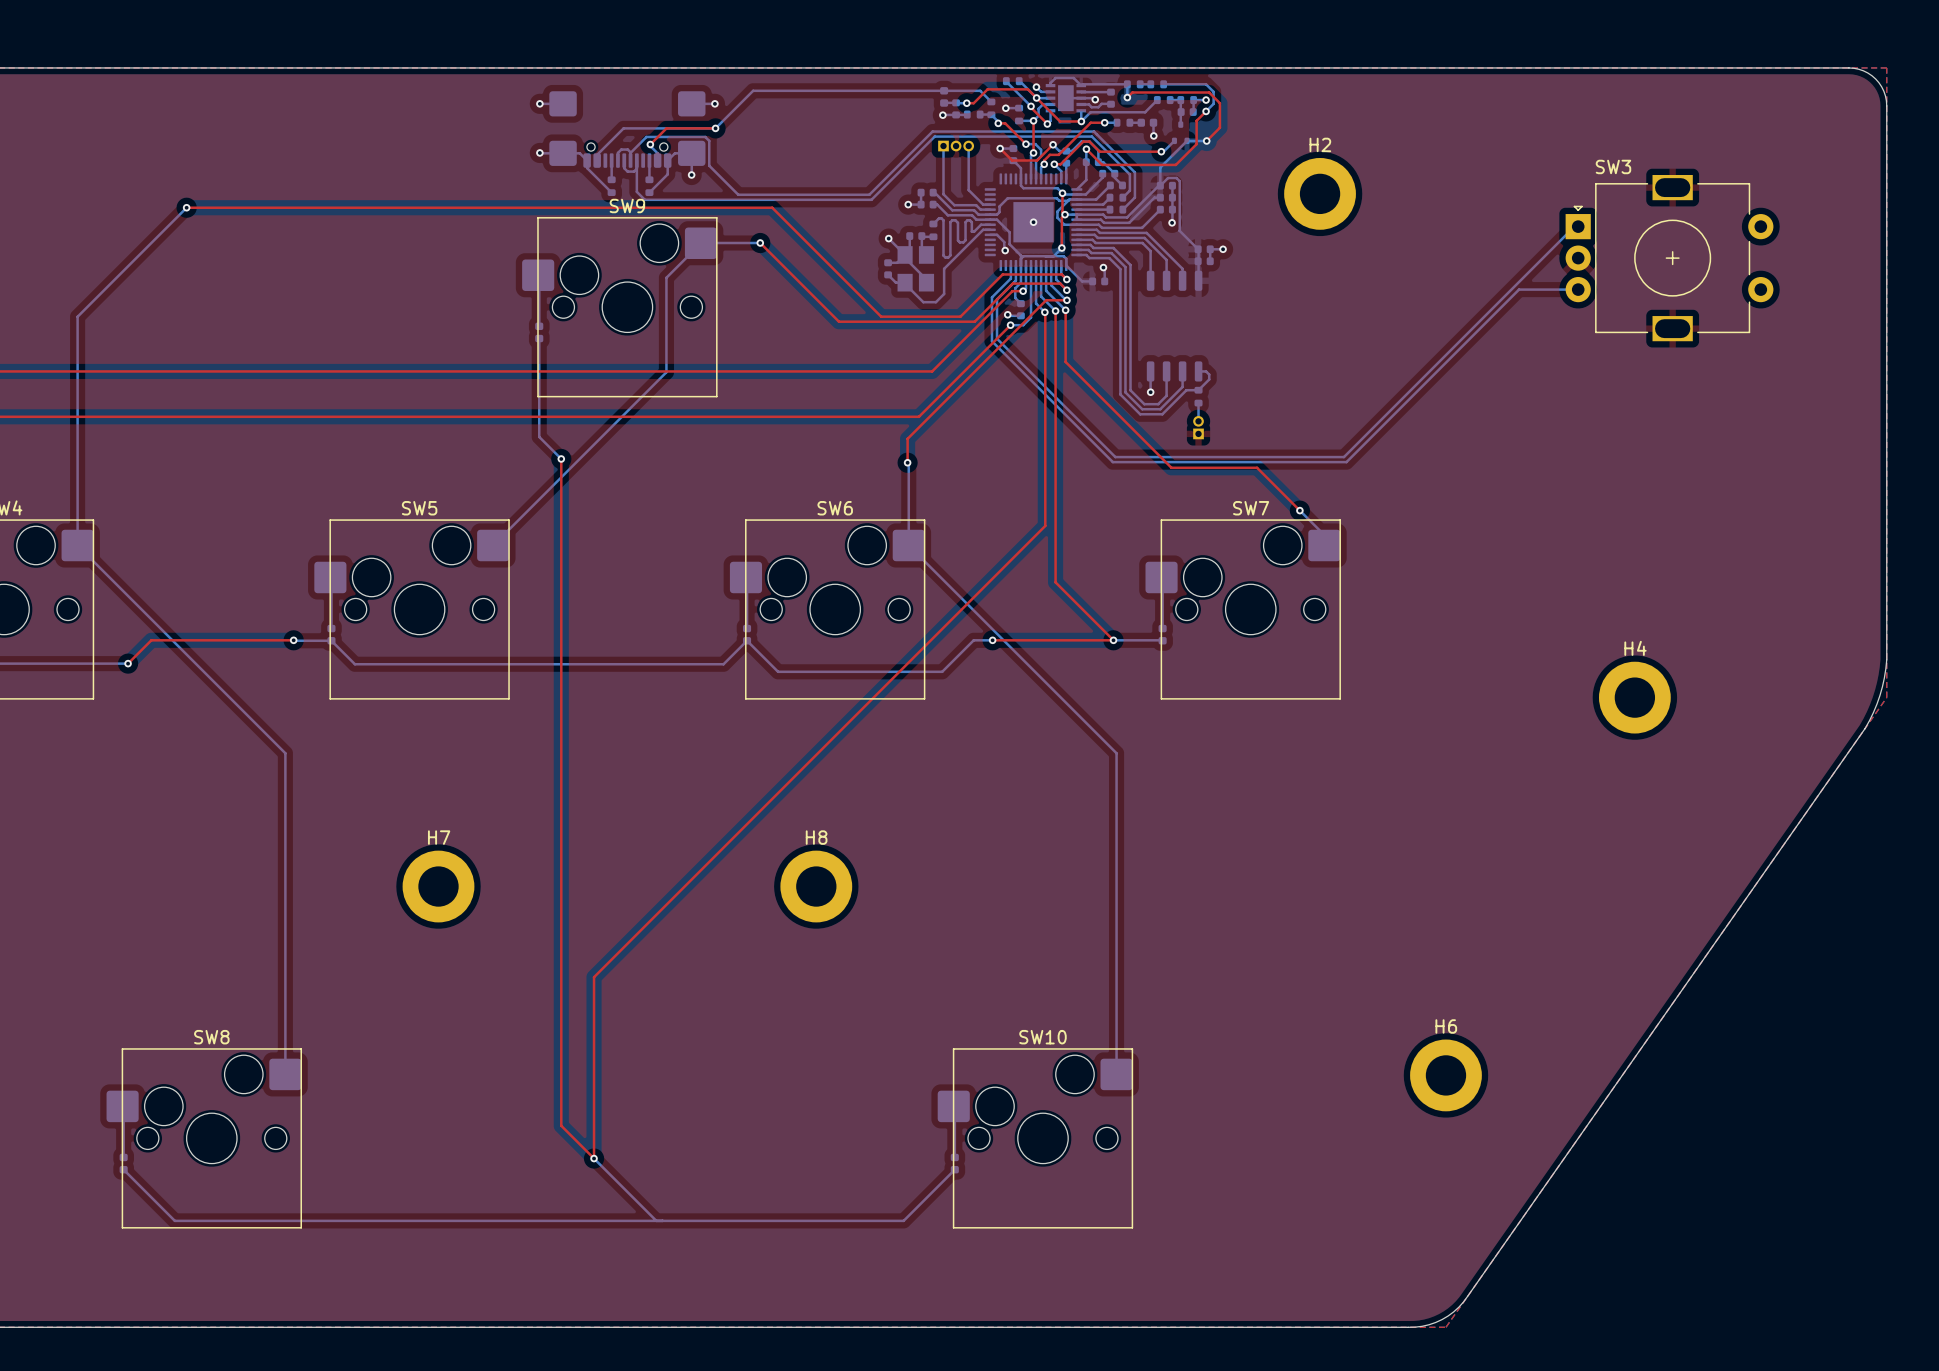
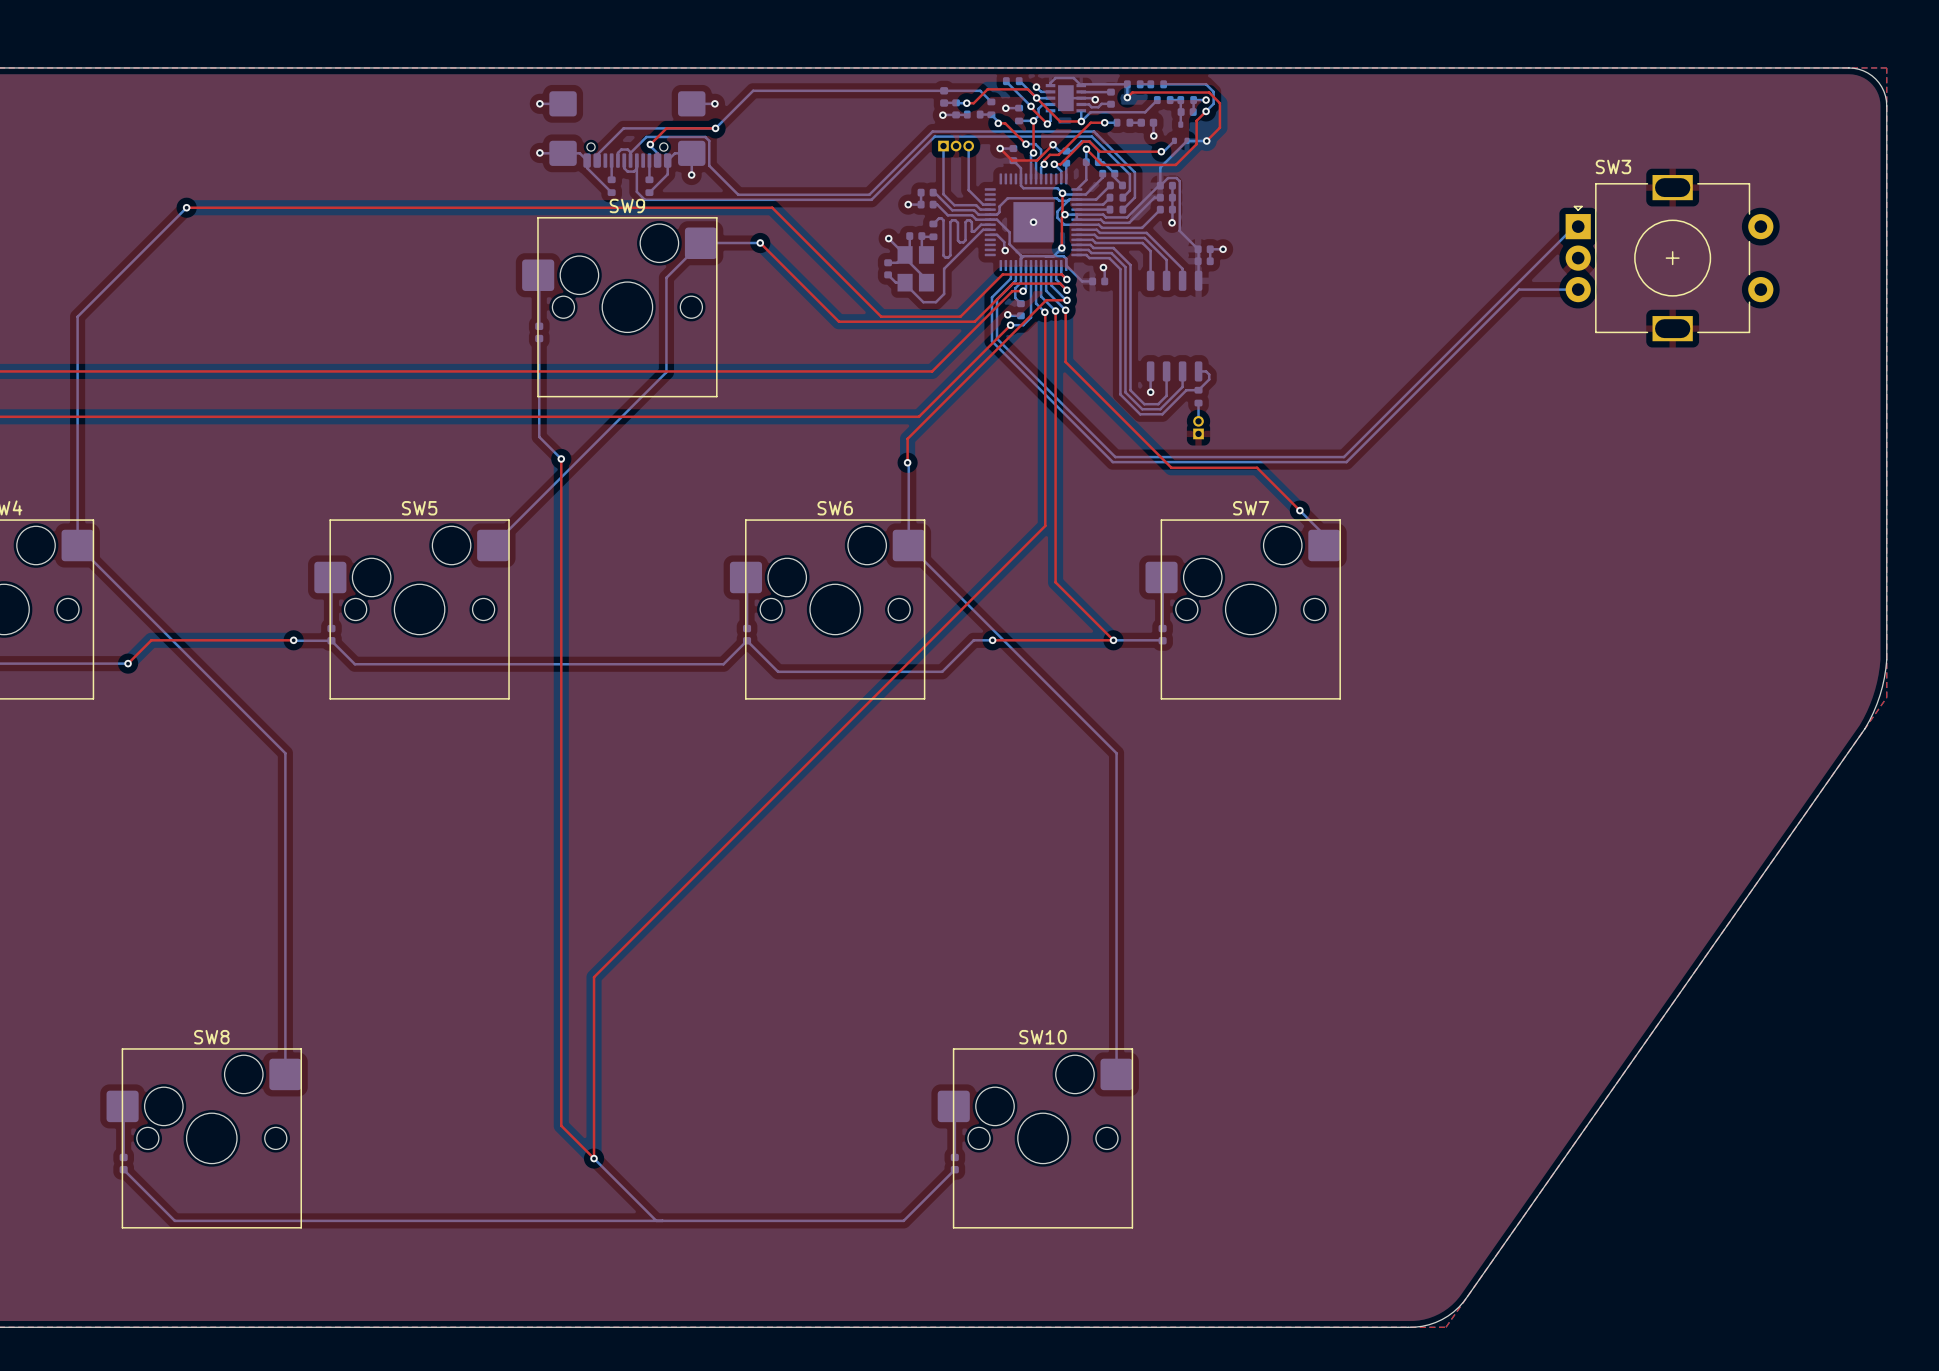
H2: (1320, 193) -> none
H4: (1634, 697) -> none
H7: (438, 886) -> none
H8: (816, 886) -> none
H6: (1445, 1075) -> none

